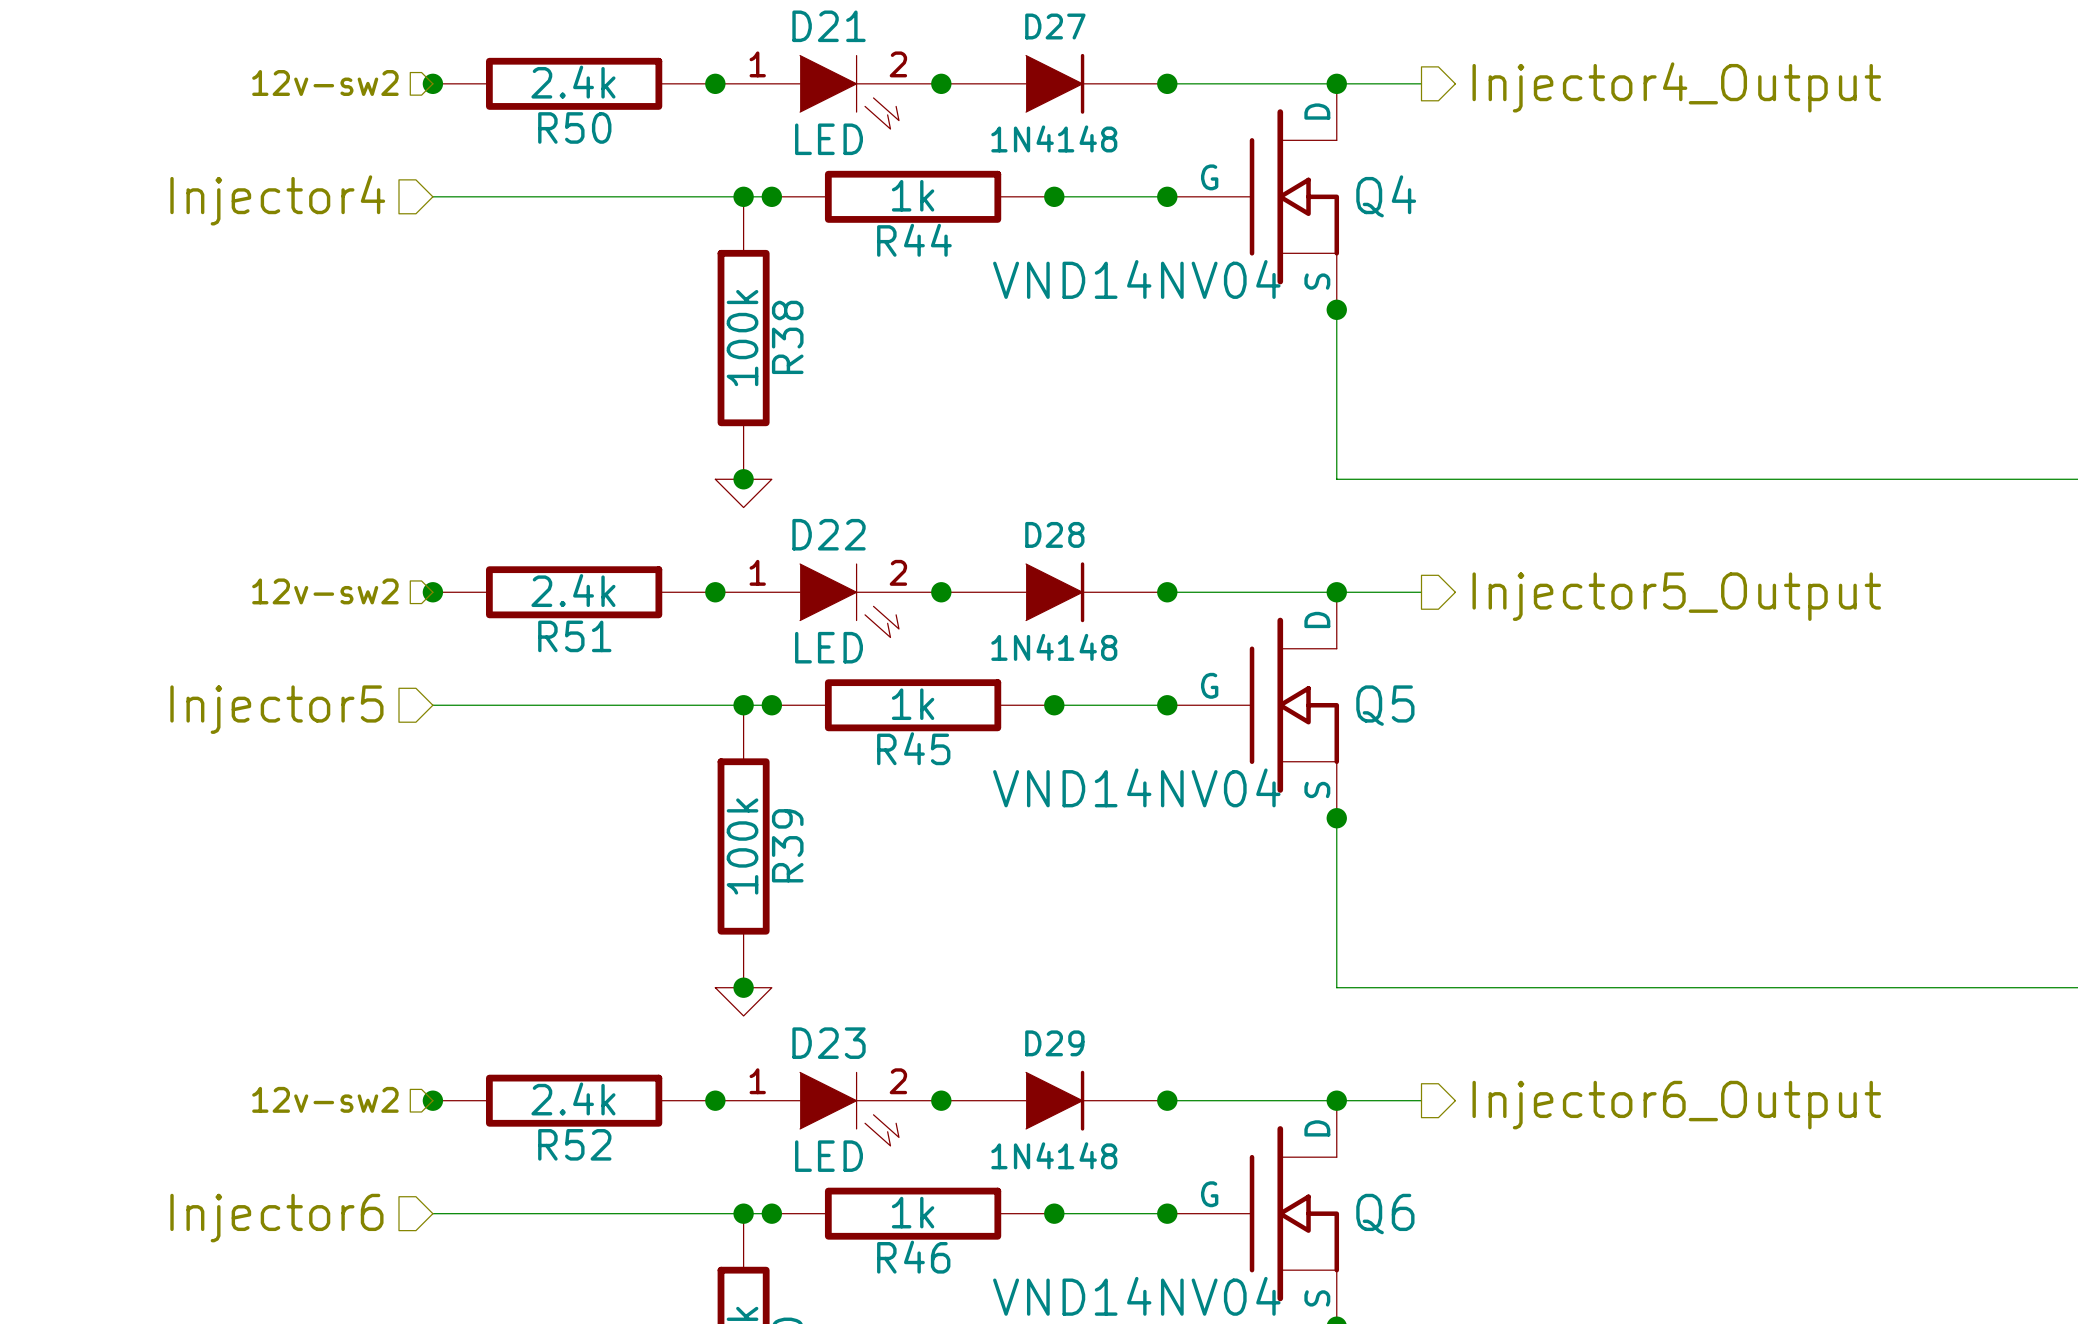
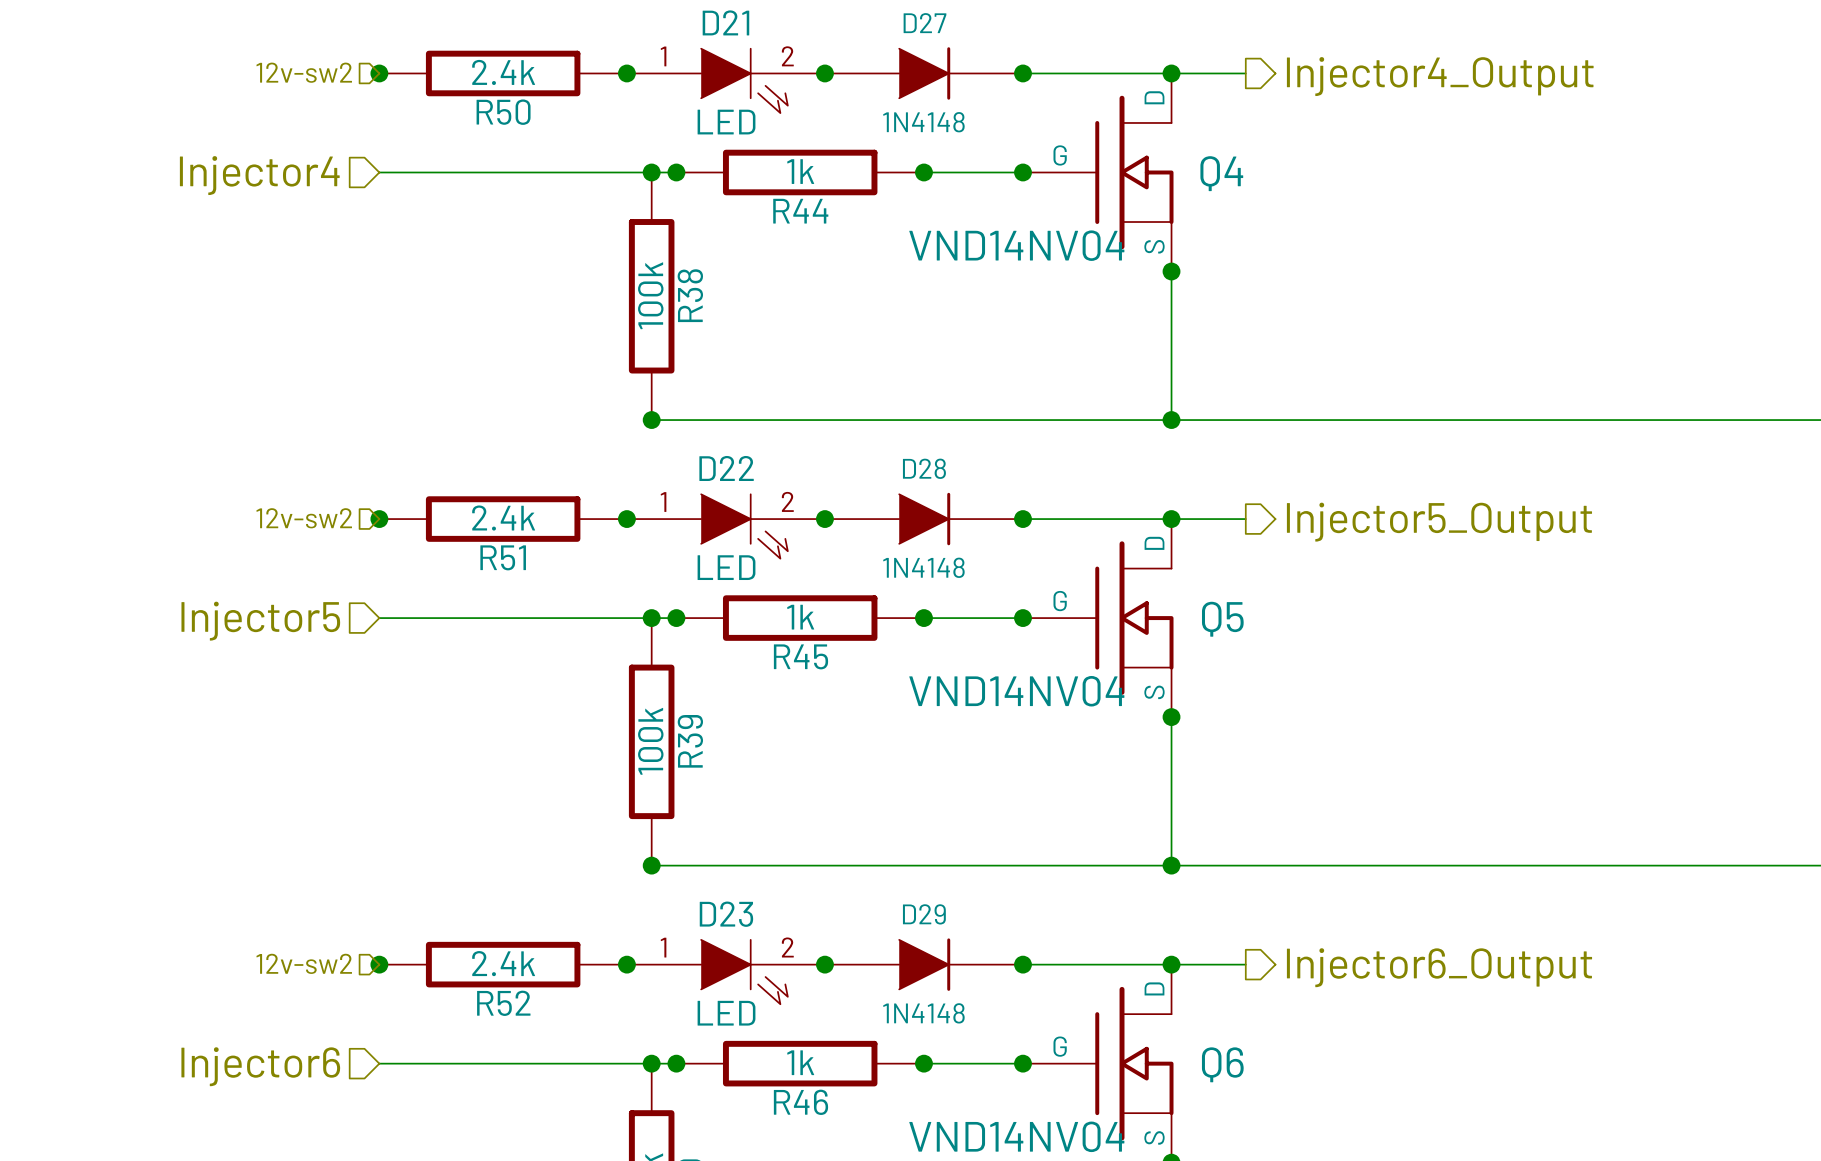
wire: none -> (651, 420) (1171, 420)
junction: none -> (1171, 420)
power symbol: (743, 493) -> none
wire: none -> (651, 865) (1171, 865)
junction: none -> (1171, 865)
power symbol: (743, 1001) -> none

